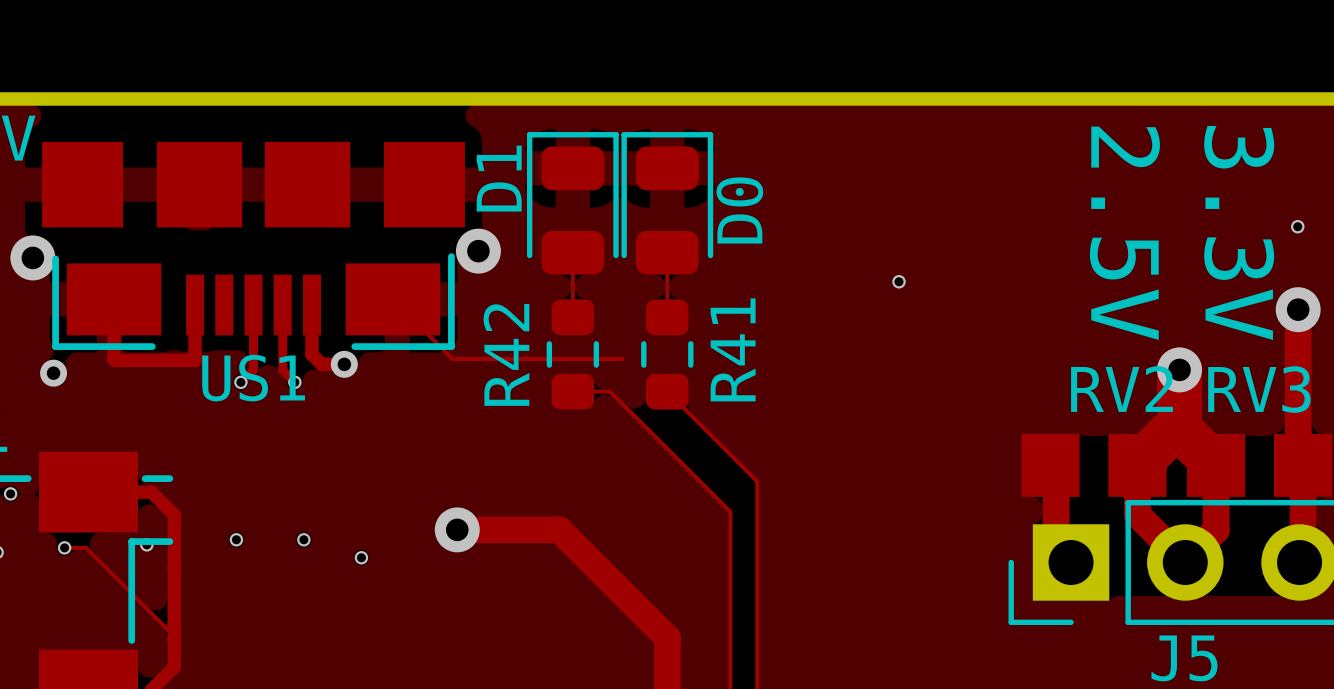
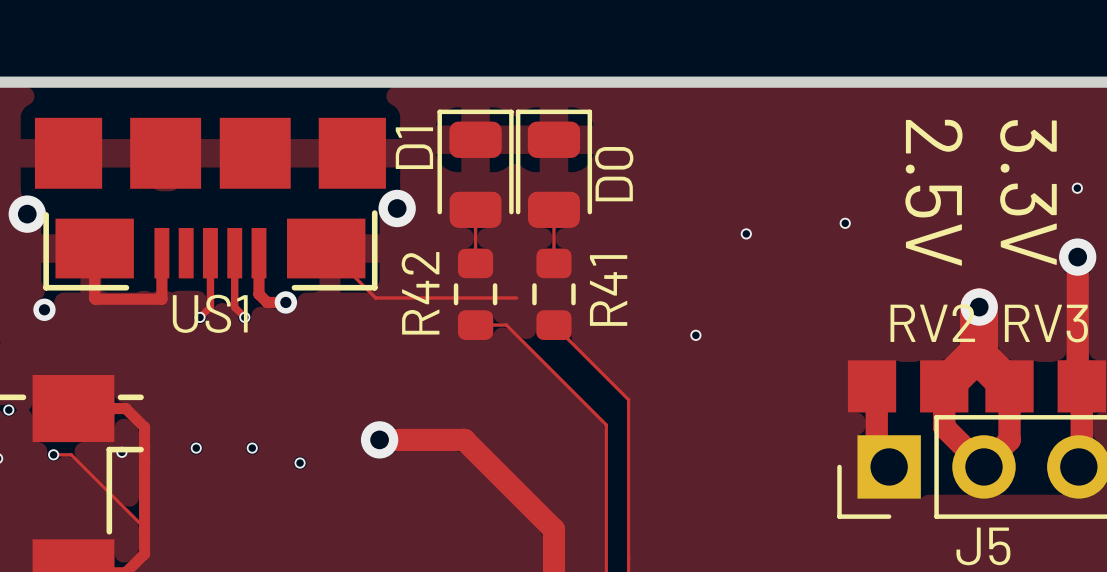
via: none -> (845, 223)
via: none -> (695, 335)

